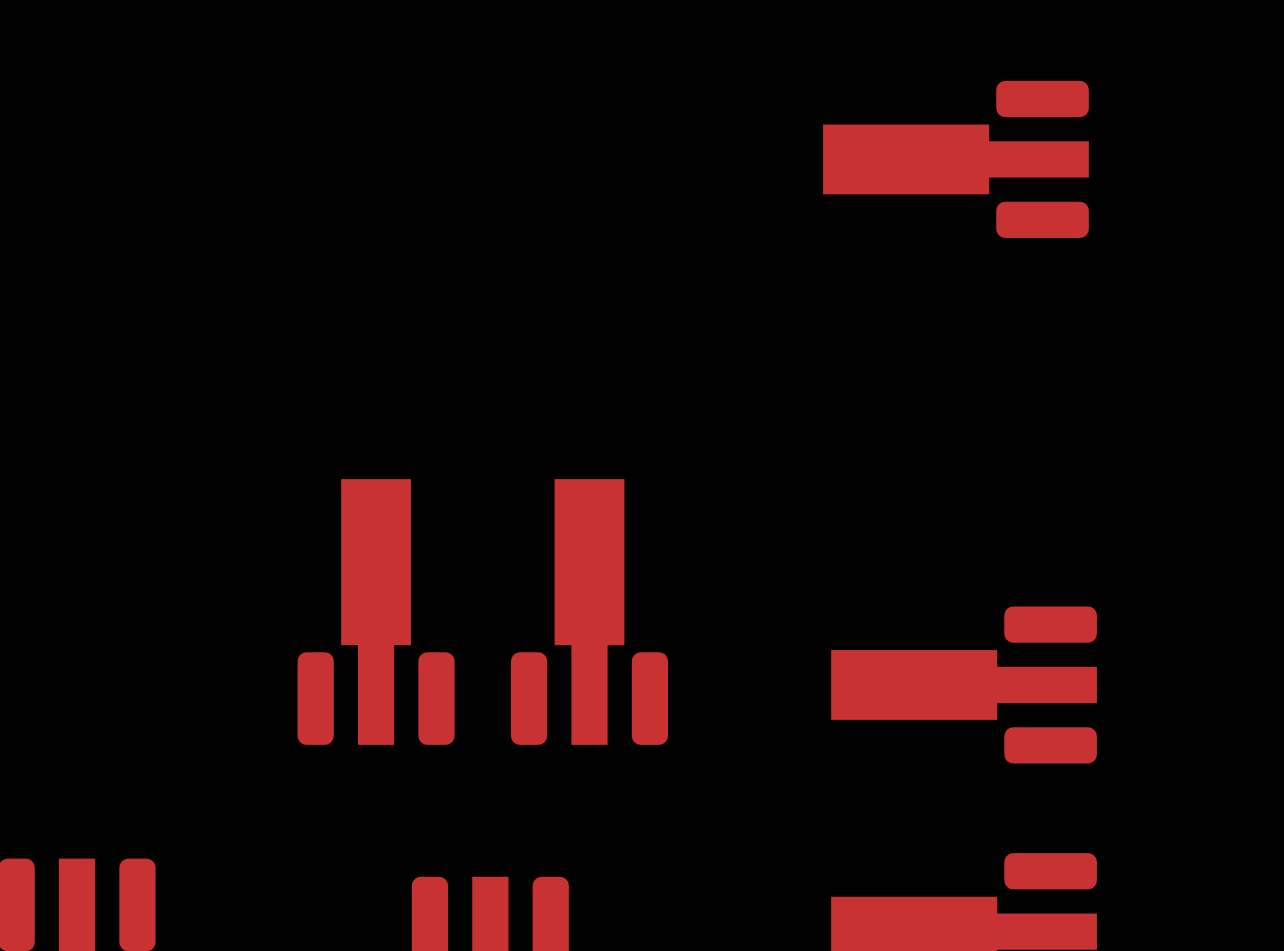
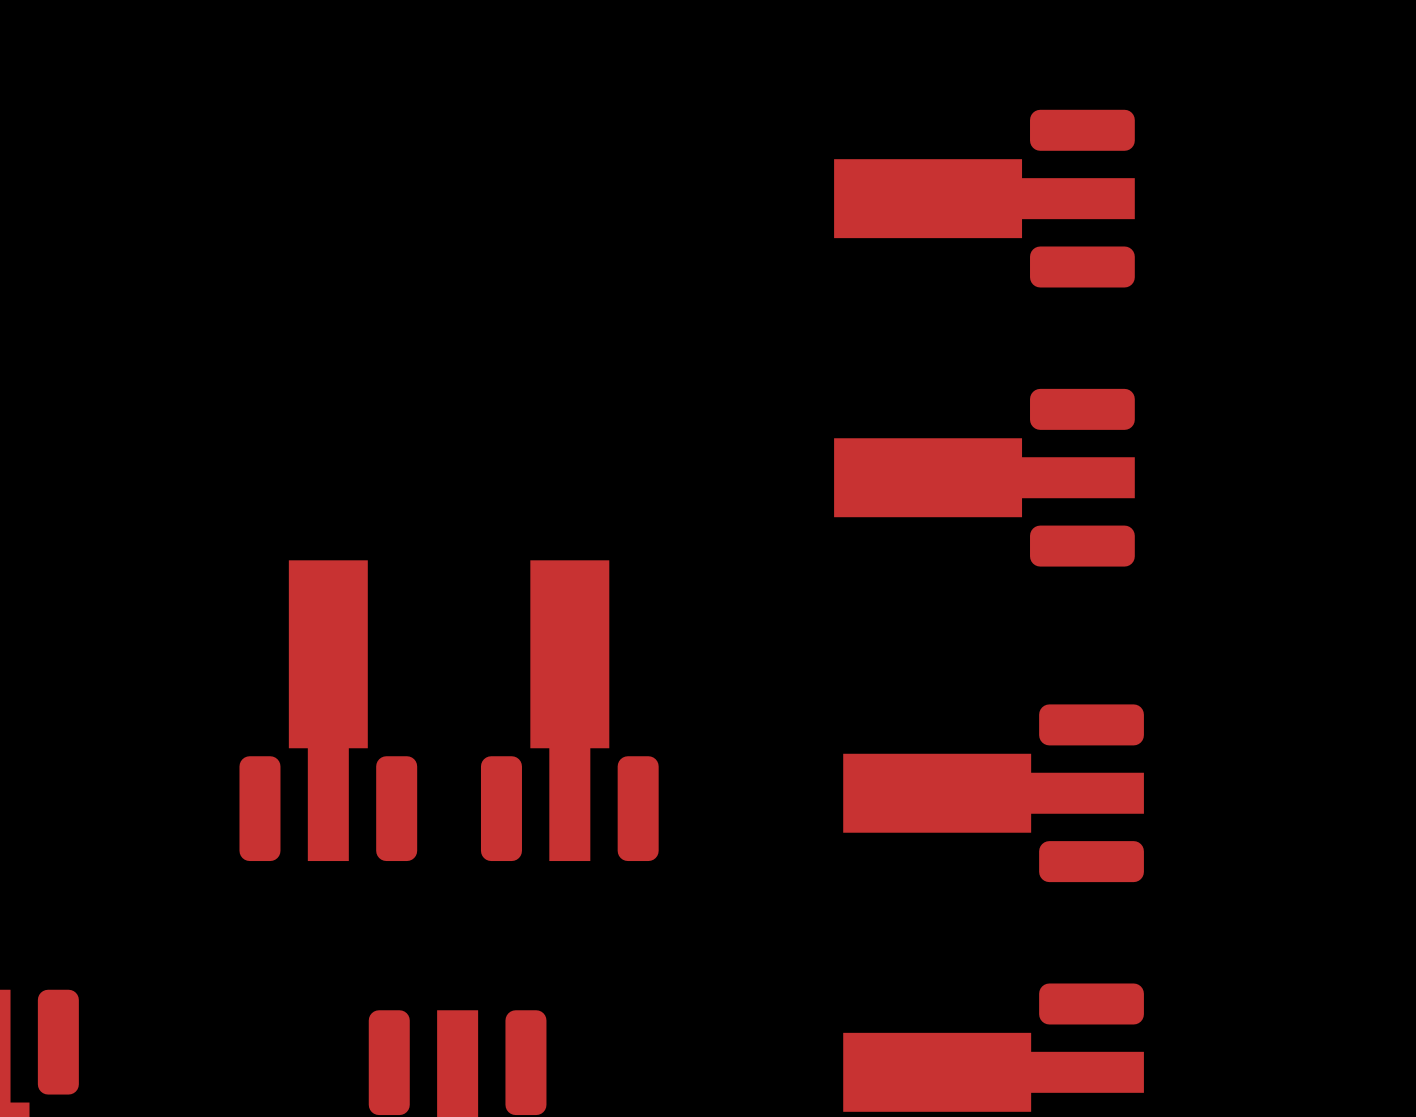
part: none -> (984, 477)

